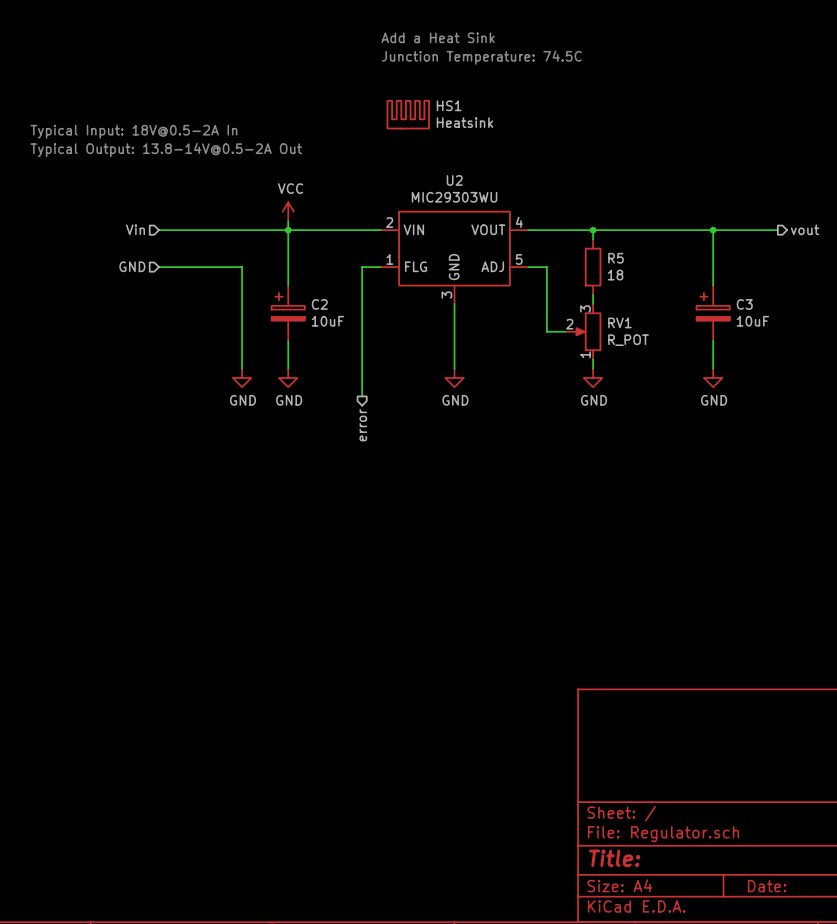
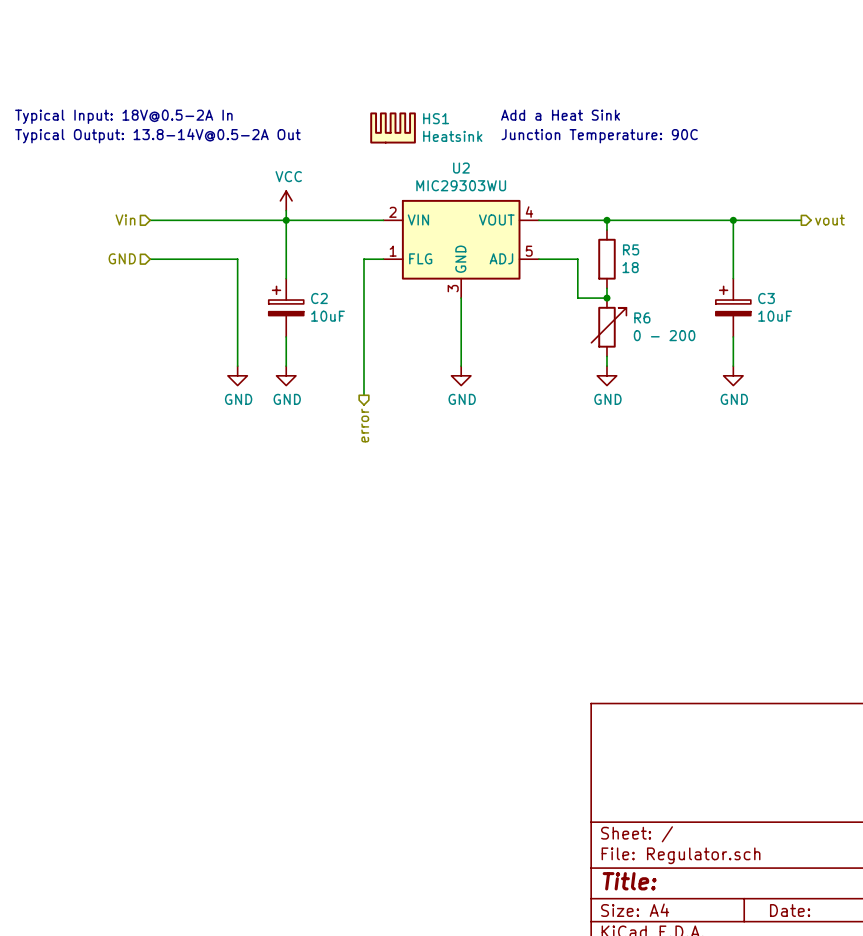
text position: Add a Heat Sink (438, 37) -> Add a Heat Sink (560, 115)
text: Junction Temperature: 74.5C (481, 57) -> none
HS1 position: (408, 114) -> (393, 127)
text: none -> Junction Temperature: 90C (599, 136)
wire: (546, 267) (546, 331) (565, 331) -> (558, 259) (577, 259) (577, 298) (606, 298)
junction: none -> (606, 298)
RV1: R_POT (583, 331) -> none
R6: none -> 0 - 200 (608, 327)

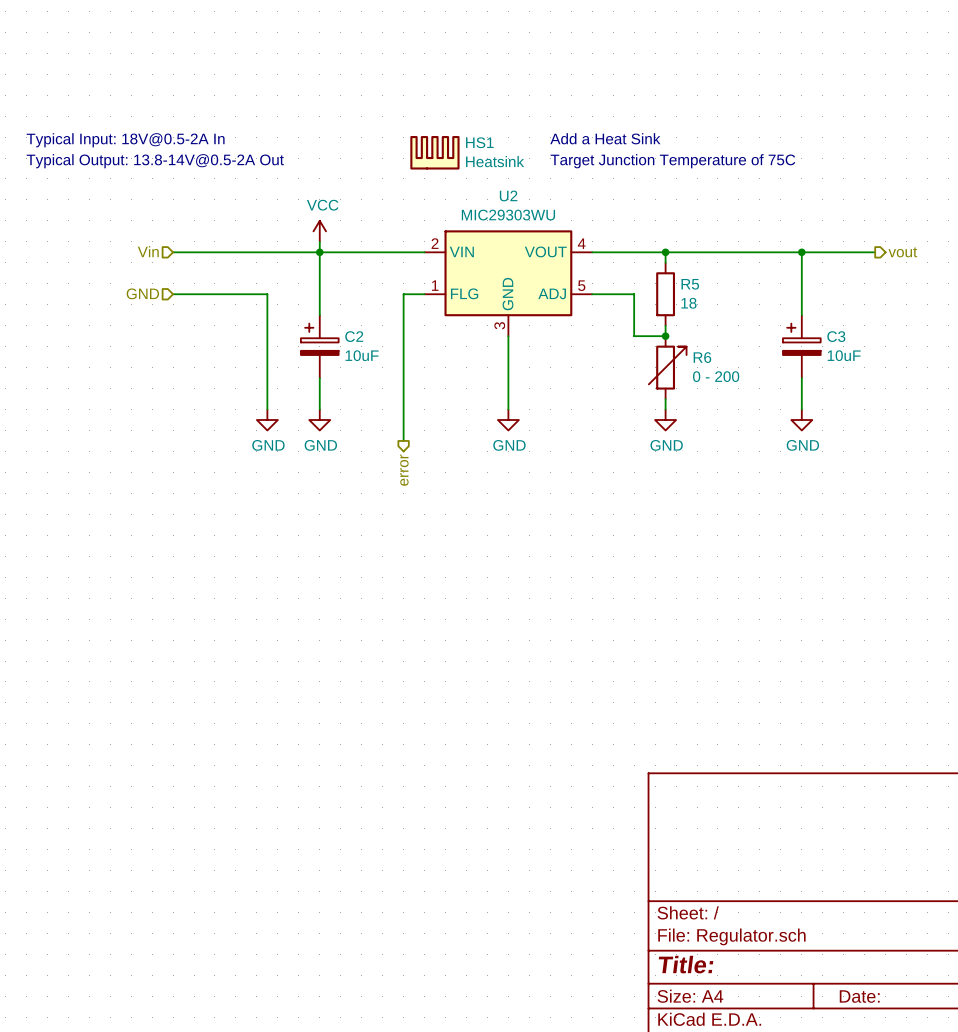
text: Junction Temperature: 90C (599, 136) -> Target Junction Temperature of 75C (672, 161)

